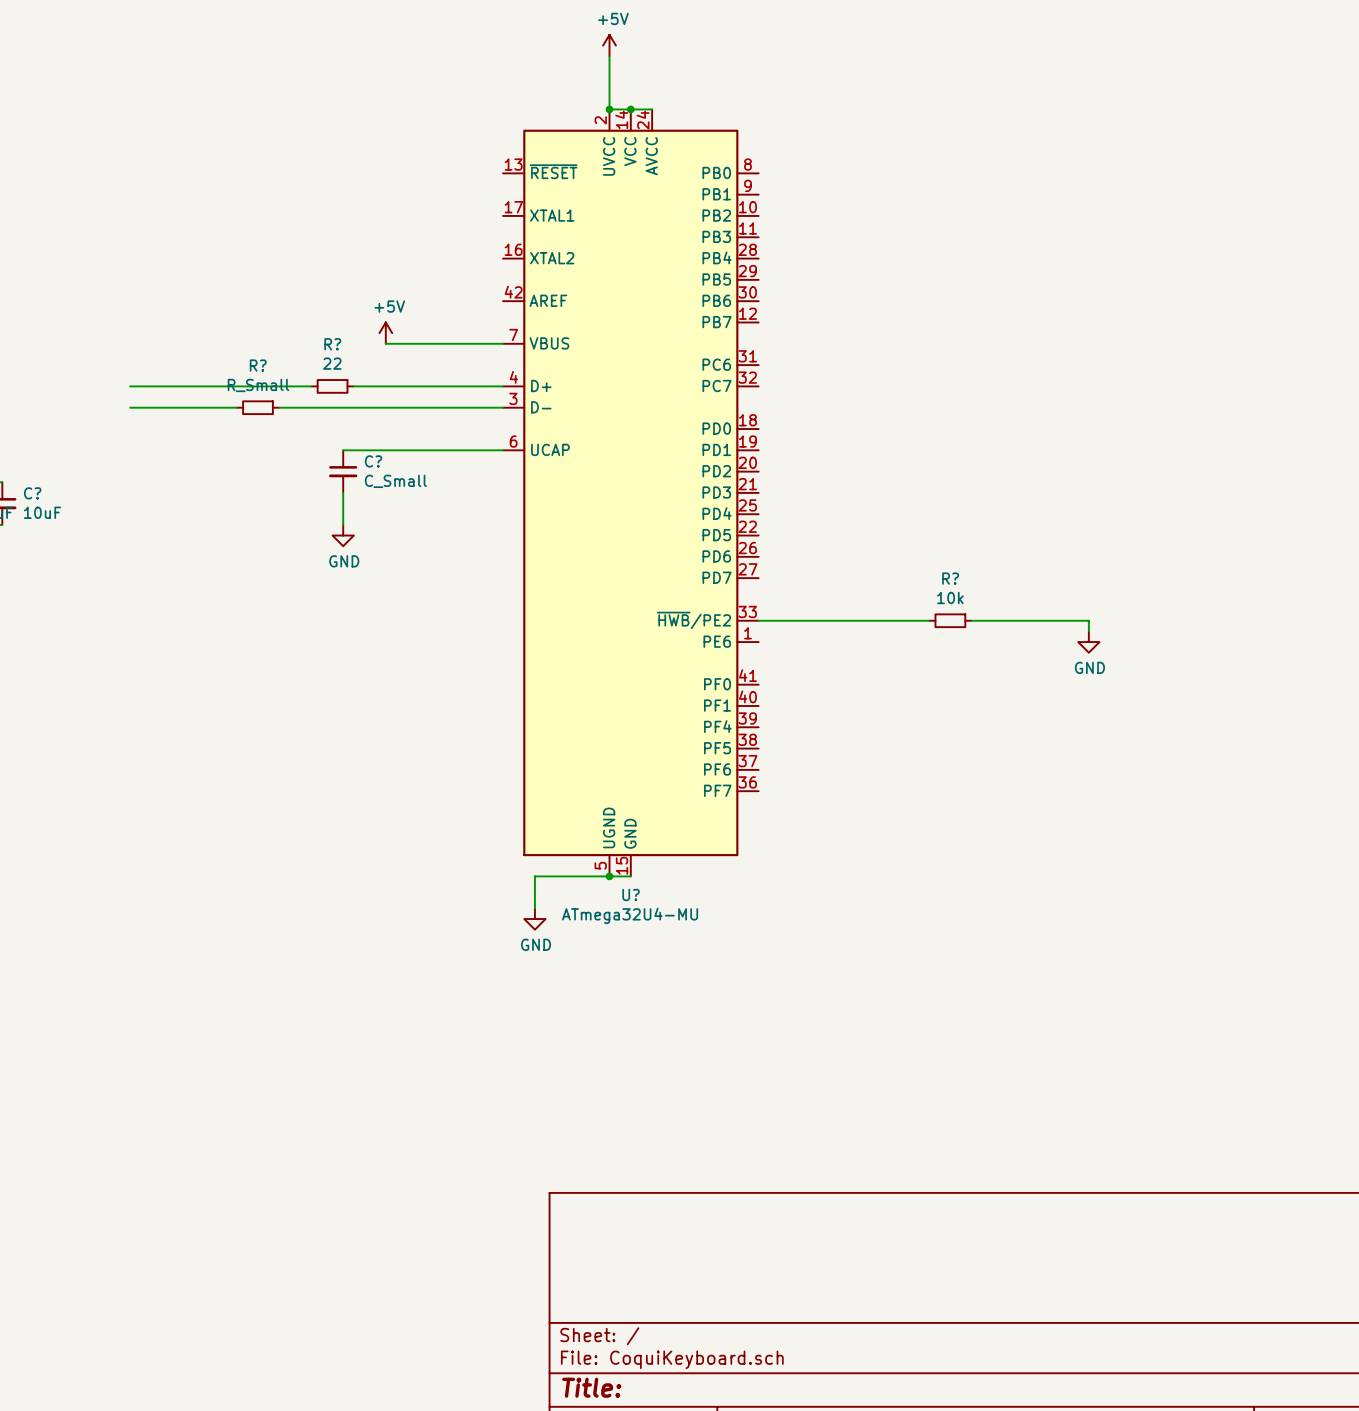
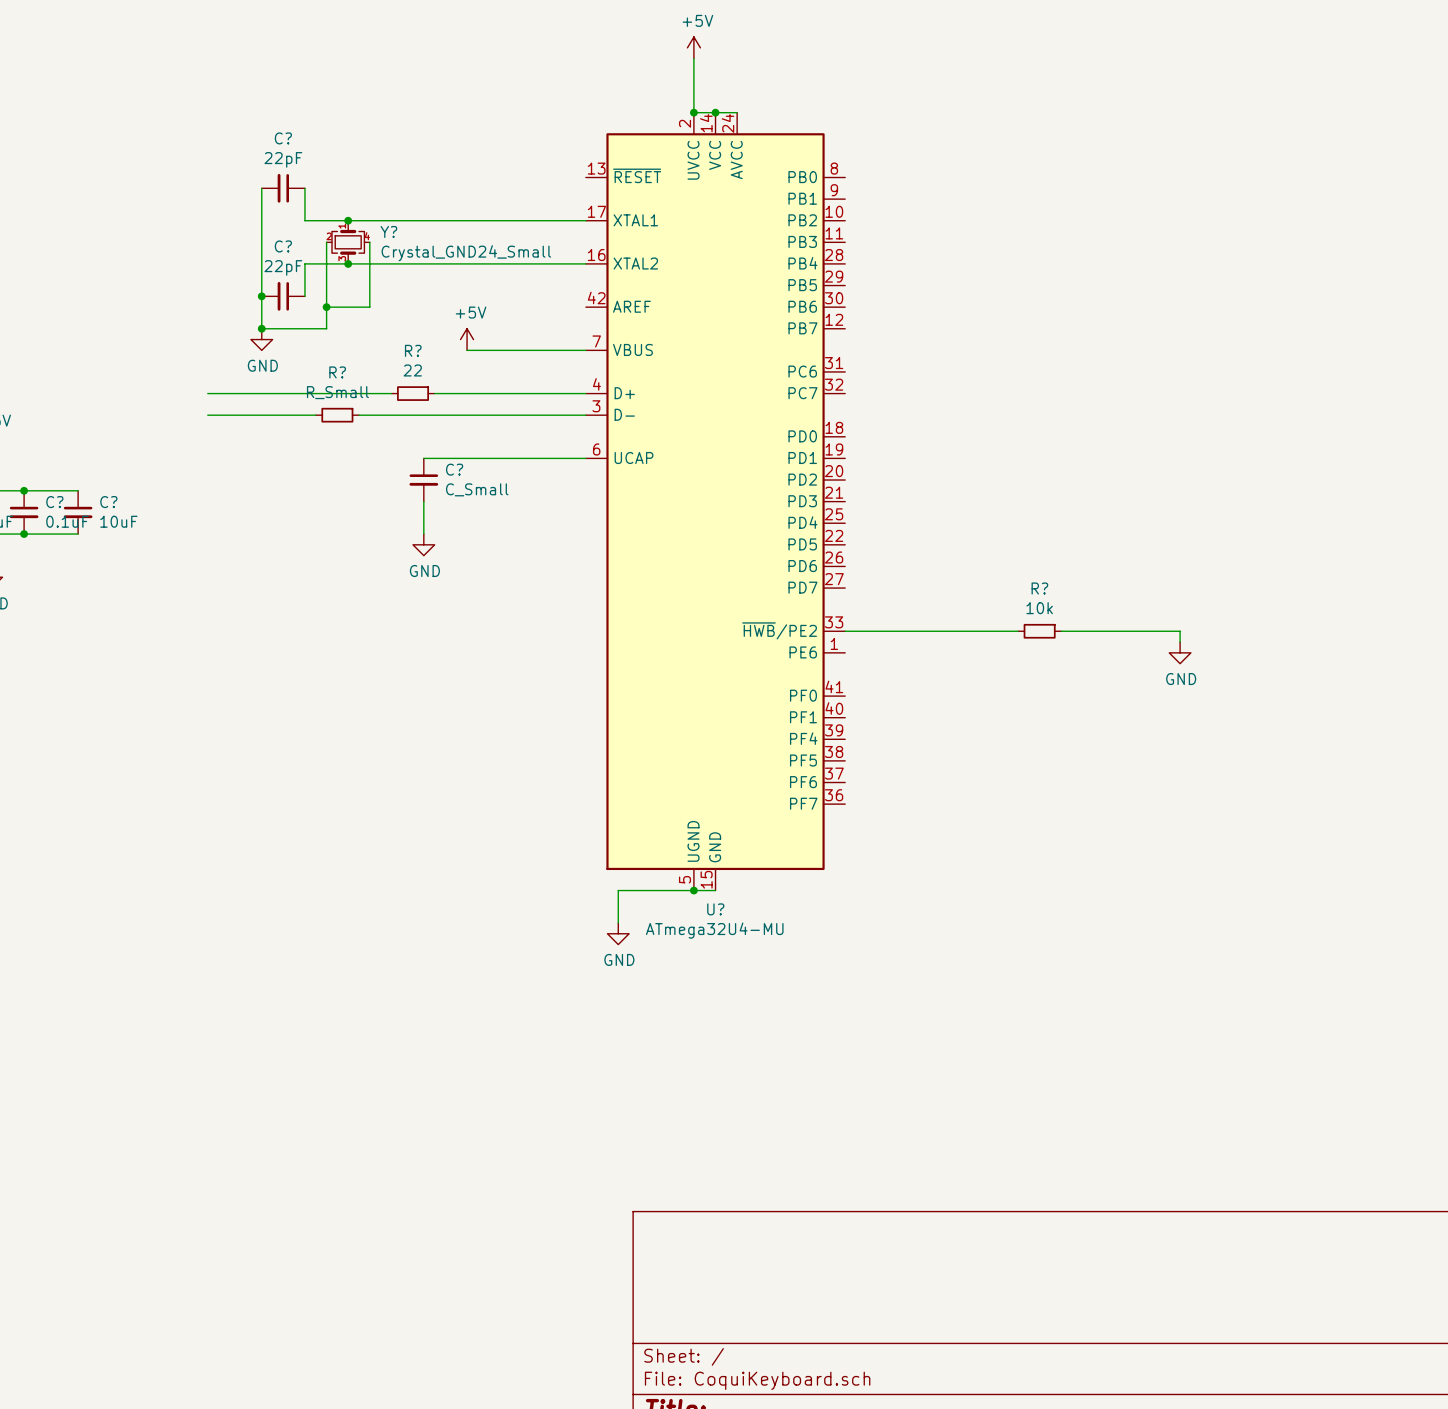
wire: none -> (261, 188) (261, 328) (326, 328) (326, 242)
C?: none -> 22pF (283, 188)
wire: none -> (304, 188) (304, 220) (585, 220)
junction: none -> (348, 220)
Y?: none -> Crystal_GND24_Small (348, 242)
wire: none -> (369, 242) (369, 307) (326, 307)
junction: none -> (348, 263)
wire: none -> (585, 263) (304, 263) (304, 296)
junction: none -> (261, 296)
C?: none -> 22pF (283, 296)
junction: none -> (326, 307)
junction: none -> (261, 328)
power symbol: none -> GND (261, 339)

